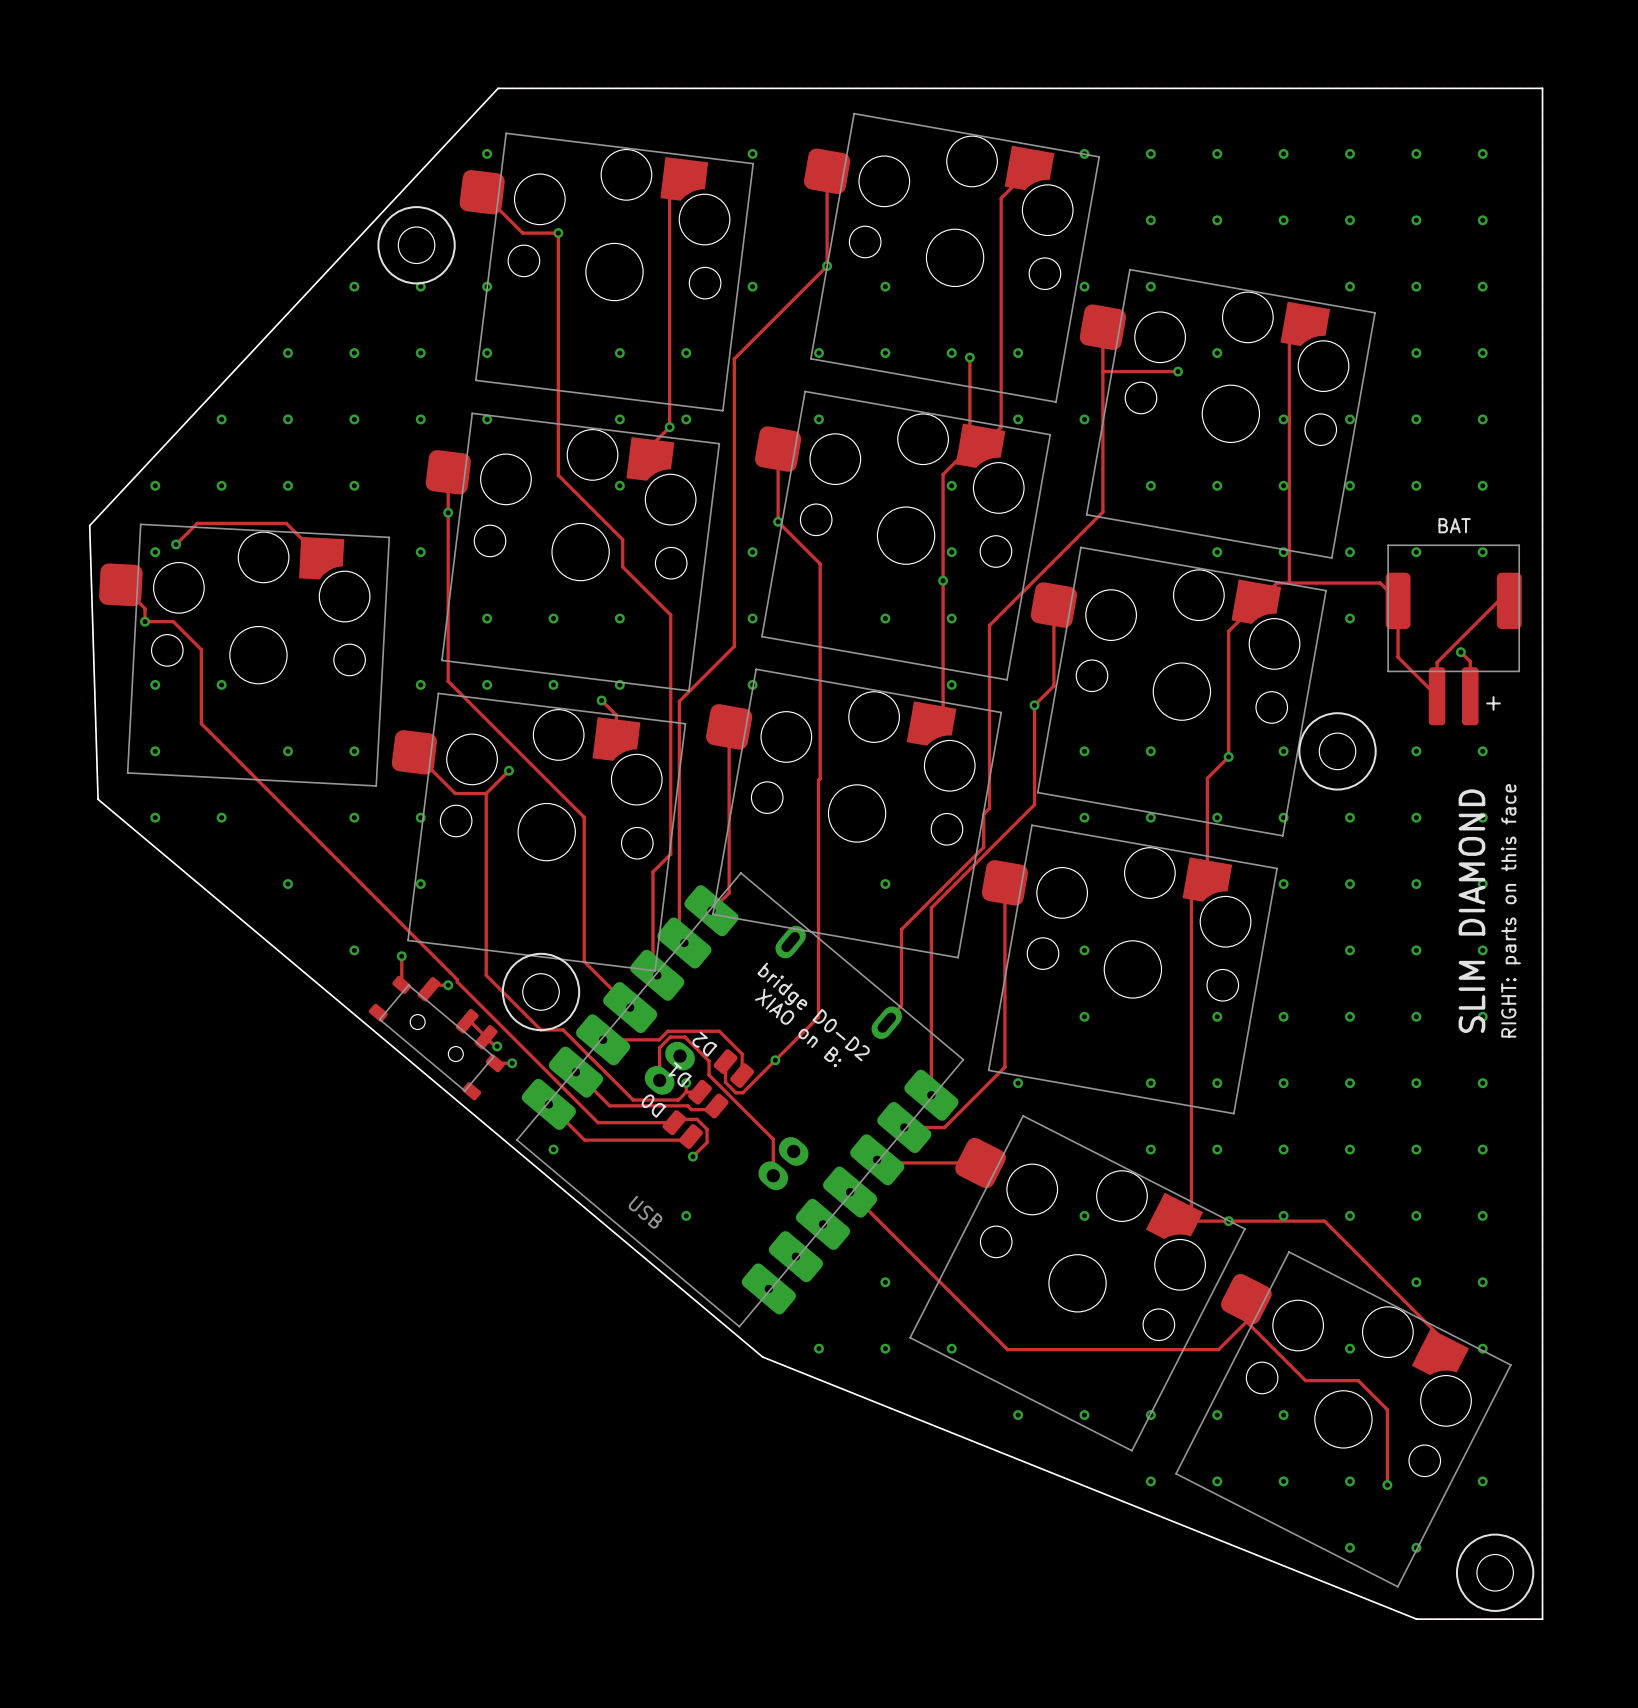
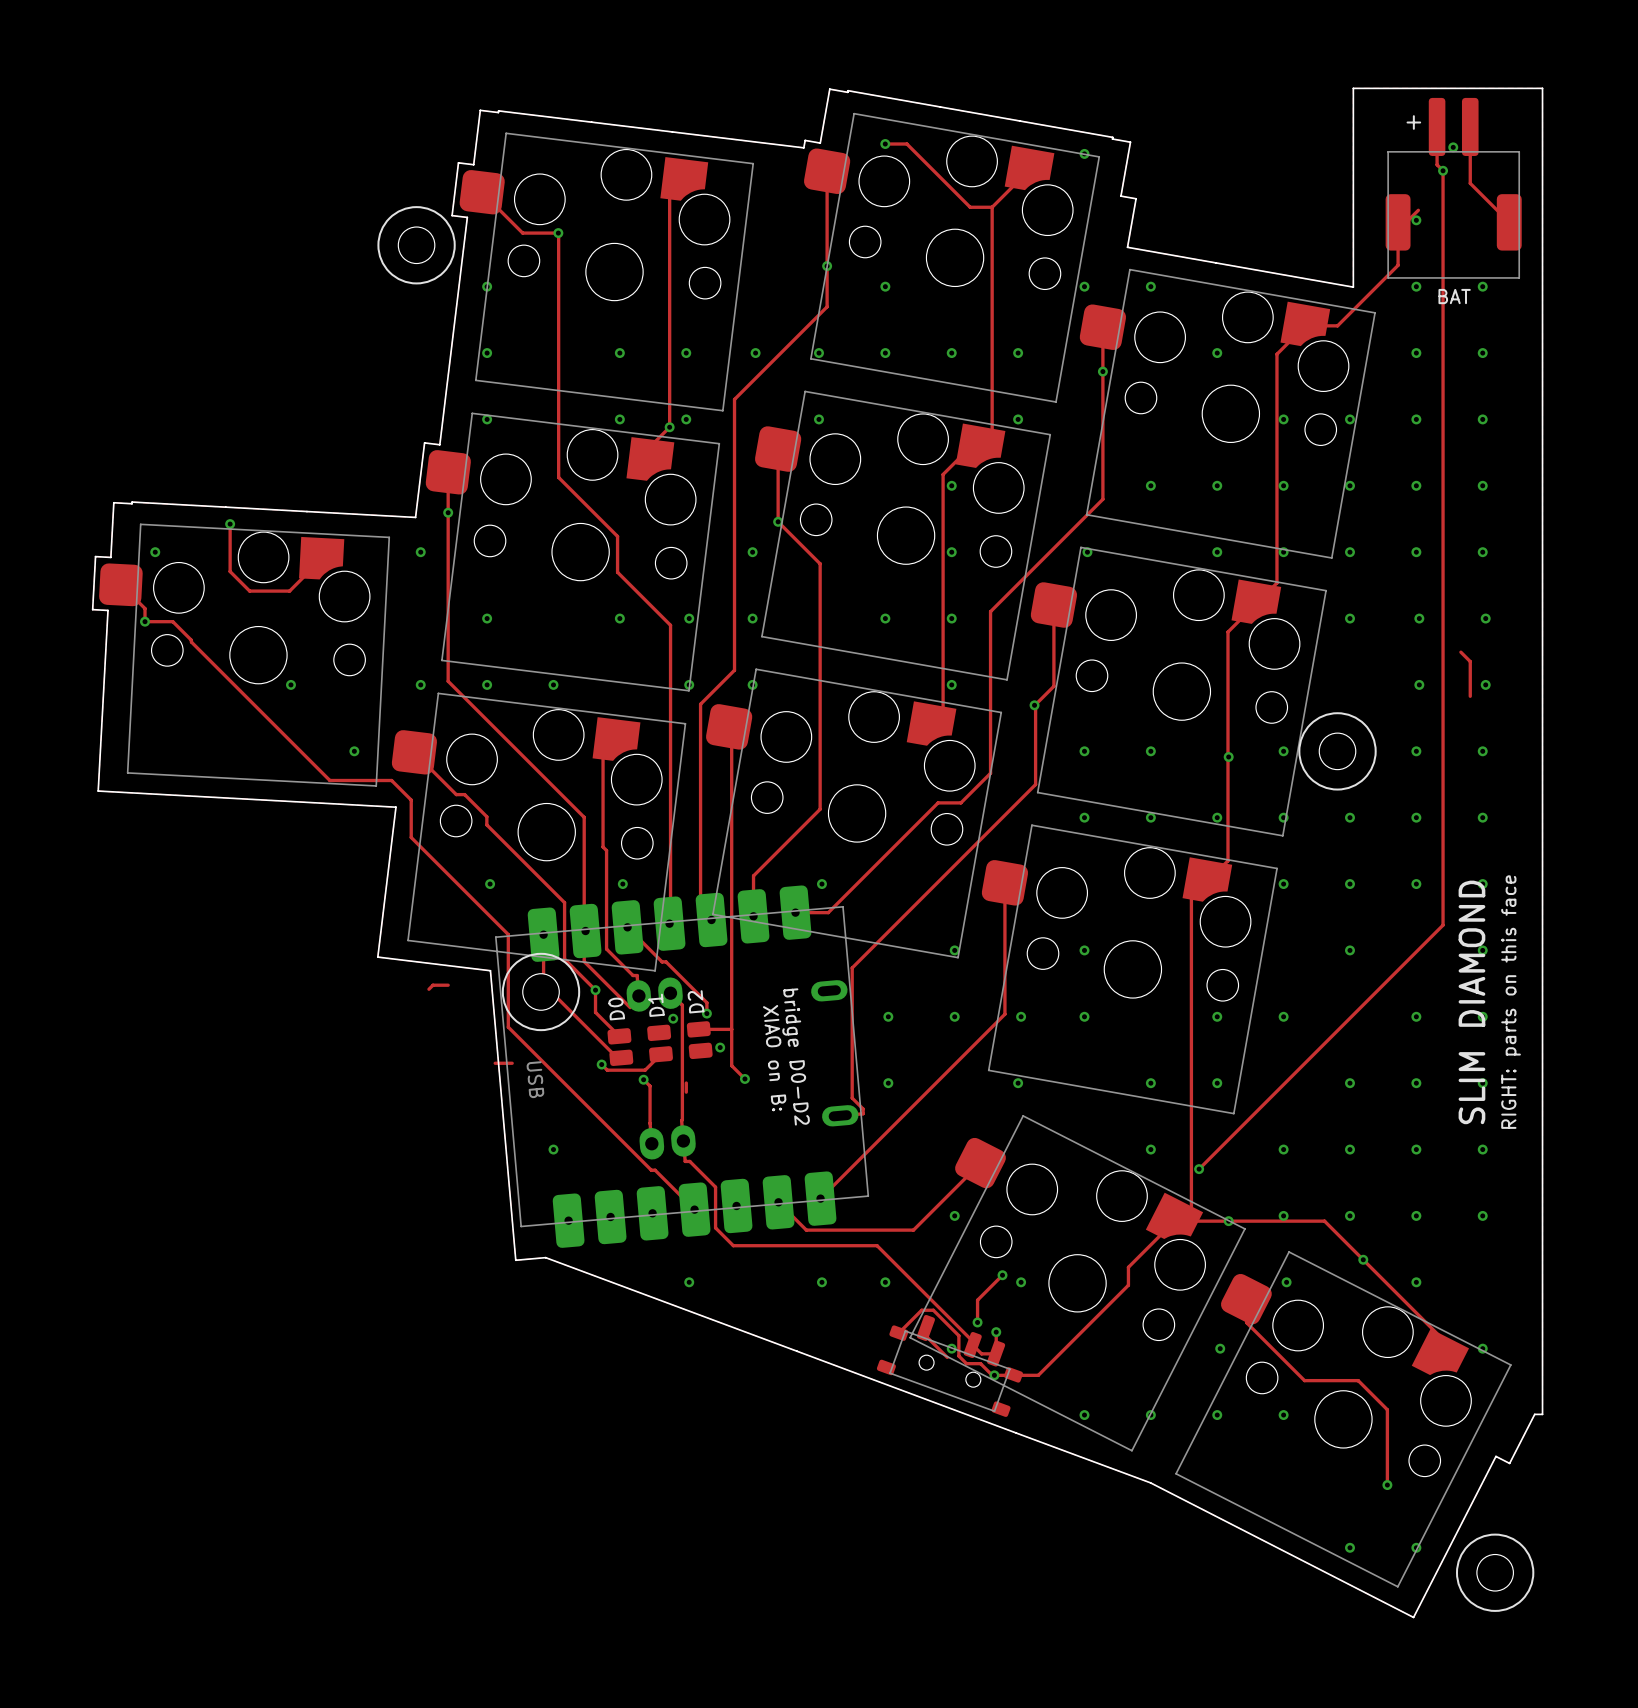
board edge: (1353, 88) (498, 88) (89, 525) (98, 799) (762, 1357) (1416, 1619) (1542, 1619) (1542, 1414) -> (1353, 88) (1353, 287) (1127, 247) (1136, 198) (1120, 196) (1130, 142) (1112, 139) (1112, 137) (848, 90) (847, 92) (829, 89) (820, 143) (805, 140) (803, 147) (498, 110) (498, 112) (480, 110) (473, 164) (458, 162) (452, 215) (467, 217) (439, 444) (424, 442) (415, 517) (132, 502) (132, 503) (113, 502) (110, 557) (95, 556) (92, 609) (108, 610) (98, 791) (395, 807) (377, 957) (490, 970) (515, 1260) (545, 1257) (1150, 1482) (1413, 1617) (1495, 1456) (1509, 1463) (1534, 1414) (1542, 1414)
track: none -> (1437, 126) (1437, 164) (1443, 170) (1443, 925) (1199, 1169)
track: none -> (1470, 126) (1470, 183) (1509, 222)
track: none -> (885, 144) (906, 144) (970, 207) (992, 207)
via: none -> (885, 144)
via: none -> (1453, 147)
via: (487, 153) -> none
via: (752, 153) -> none
via: (1150, 153) -> none
via: (1217, 153) -> none
via: (1283, 153) -> none
via: (1349, 153) -> none
via: (1416, 153) -> none
via: (1482, 153) -> none
via: none -> (1443, 170)
part: none -> (1453, 188)
track: (1001, 198) (1001, 427) (992, 436) -> (992, 207) (992, 436)
track: none -> (1001, 198) (992, 207)
track: none -> (1418, 210) (1406, 222) (1398, 222) (1398, 265) (1337, 325) (1305, 325)
via: (1150, 220) -> none
via: (1217, 220) -> none
via: (1283, 220) -> none
via: (1349, 220) -> none
via: (1482, 220) -> none
track: (558, 233) (558, 475) (622, 539) (622, 566) (670, 615) (670, 854) (652, 871) (652, 971) (657, 975) -> (558, 233) (558, 477) (617, 536) (617, 572) (670, 625) (669, 923)
track: (827, 266) (734, 358) (734, 646) (679, 701) (679, 937) (684, 943) -> (827, 266) (827, 306) (734, 399) (734, 670) (700, 704) (700, 909) (711, 919)
via: (354, 286) -> none
via: (420, 286) -> none
via position: (752, 286) -> (755, 353)
via: (1349, 286) -> none
track: (1289, 341) (1289, 583) -> (1289, 341) (1276, 354) (1276, 583)
via: (287, 353) -> none
via: (354, 353) -> none
via: (420, 353) -> none
track: (969, 357) (969, 447) (980, 447) -> none
via: (969, 357) -> none
track: (1102, 371) (1178, 371) -> none
via: none -> (1102, 371)
via: (1178, 371) -> none
via: (221, 419) -> none
via: (287, 419) -> none
via: (354, 419) -> none
via: (420, 419) -> none
via: (1084, 419) -> none
via: (155, 485) -> none
via: (221, 485) -> none
via: (287, 485) -> none
via: (354, 485) -> none
via: (619, 485) -> none
track: (1102, 499) (1102, 512) (989, 625) (989, 808) (983, 814) (983, 847) (901, 929) (901, 1005) (886, 1022) -> (1102, 499) (990, 611) (990, 773) (960, 802) (938, 802) (828, 912) (795, 912)
via: none -> (230, 524)
track: (176, 544) (197, 523) (286, 523) (321, 558) -> (230, 524) (230, 571) (249, 591) (289, 591) (321, 558)
via: (176, 544) -> none
via: none -> (1087, 552)
via: (943, 580) -> none
track: (1276, 583) (1380, 583) (1398, 600) (1398, 657) (1437, 696) (1437, 662) (1498, 600) (1509, 600) -> none
via: (553, 618) -> none
via: none -> (689, 618)
via: none -> (1419, 618)
via: none -> (1485, 618)
track: (172, 621) (201, 649) (201, 723) (598, 1122) (674, 1122) (677, 1119) (697, 1119) (707, 1129) (707, 1142) (692, 1156) -> (172, 621) (329, 780) (391, 780) (411, 800) (411, 837) (508, 934) (508, 1027) (651, 1170) (655, 1170) (694, 1209)
track: (1228, 631) (1228, 756) (1207, 778) (1207, 881) -> (1228, 631) (1227, 860) (1207, 881)
part: (1453, 634) -> none
via: (1460, 652) -> none
via: (155, 684) -> none
via: (221, 684) -> none
via: none -> (290, 684)
via: (619, 684) -> none
via: none -> (689, 684)
via: none -> (1419, 684)
via: none -> (1485, 684)
track: (1053, 685) (1034, 705) (1034, 804) (931, 907) (931, 1095) -> (1053, 685) (1035, 704) (1035, 784) (852, 967) (852, 1098) (863, 1109) (863, 1113) (840, 1115)
track: (601, 700) (616, 715) (616, 740) -> (638, 995) (637, 975) (633, 975) (606, 949) (606, 850) (603, 847) (603, 753) (616, 740)
via: (601, 700) -> none
track: (729, 726) (729, 893) (711, 910) -> (729, 726) (731, 729) (731, 1065) (744, 1078)
via: (155, 751) -> none
via: (287, 751) -> none
track: (508, 770) (486, 793) -> none
via: (508, 770) -> none
track: (820, 778) (818, 780) (818, 1017) (742, 1092) (735, 1092) (725, 1082) (725, 1061) -> (820, 778) (820, 809) (753, 875) (753, 916)
track: (455, 793) (486, 793) -> (455, 793) (464, 794) (486, 816) (486, 824) (564, 902) (564, 959) (595, 990) (595, 1012) (619, 1036)
track: (486, 793) (486, 975) (540, 1029) (563, 1029) (633, 1100) (678, 1100) (686, 1092) (700, 1092) -> none
via: (155, 817) -> none
via: (221, 817) -> none
via: (354, 817) -> none
via: (420, 817) -> none
via: (287, 884) -> none
via: (420, 884) -> none
via: none -> (490, 884)
via: none -> (622, 884)
via: none -> (821, 884)
via: (885, 884) -> none
text position: RIGHT: parts on this face (1511, 910) -> RIGHT: parts on this face (1511, 1002)
text position: SLIM DIAMOND (1471, 911) -> SLIM DIAMOND (1471, 1002)
track: none -> (627, 927) (706, 1002) (706, 1013)
track: none -> (543, 934) (543, 984) (617, 1057) (621, 1057)
via: (354, 950) -> none
via: none -> (954, 950)
via: (1416, 950) -> none
track: (401, 956) (401, 984) -> none
via: (401, 956) -> none
via: (448, 985) -> none
via: none -> (595, 990)
track: none -> (670, 993) (682, 1005) (681, 1120) (685, 1161) (689, 1161) (715, 1187) (715, 1227) (733, 1245) (877, 1245) (972, 1341) (972, 1345) (981, 1353) (996, 1353) (996, 1332)
via: none -> (706, 1013)
track: (1004, 1014) (1004, 1067) (944, 1127) (904, 1127) -> (1004, 1014) (820, 1198)
via: none -> (888, 1016)
via: none -> (954, 1016)
via: none -> (1021, 1016)
via: (1349, 1016) -> none
via: none -> (673, 1018)
track: (467, 1021) (470, 1021) (497, 1046) -> none
track: none -> (698, 1029) (731, 1029)
part: (436, 1038) -> none
track: (603, 1039) (659, 1039) (667, 1031) (719, 1031) (742, 1054) (742, 1075) -> none
part: none -> (699, 1040)
part: none -> (660, 1043)
text rotation: 0° (704, 1044) -> 45° clockwise (695, 1001)
via: (497, 1046) -> none
part: none -> (620, 1047)
via: none -> (720, 1047)
track: none -> (661, 1054) (645, 1070) (607, 1070) (601, 1064)
via: (775, 1060) -> none
via: (512, 1063) -> none
via: none -> (601, 1064)
part: none -> (682, 1066)
part: (733, 1068) -> none
track: (576, 1072) (609, 1105) (687, 1105) (691, 1109) (712, 1109) (716, 1106) -> none
text rotation: 0° (679, 1074) -> 45° clockwise (656, 1005)
text position: D1 (679, 1074) -> D1 (656, 1005)
via: none -> (744, 1078)
track: none -> (643, 1079) (650, 1086) (651, 1143)
via: none -> (643, 1079)
track: (659, 1080) (659, 1047) (670, 1037) (684, 1037) (709, 1061) (709, 1075) (773, 1139) (773, 1175) -> none
via: (686, 1083) -> none
via: none -> (888, 1083)
via: (1283, 1083) -> none
part: (708, 1099) -> none
part: (740, 1099) -> none
track: (548, 1104) (584, 1140) (687, 1140) (690, 1136) -> none
text rotation: 0° (653, 1106) -> 45° clockwise (616, 1008)
text position: D0 (653, 1106) -> D0 (616, 1008)
part: (682, 1129) -> none
via position: (1217, 1149) -> (1199, 1169)
via: (692, 1156) -> none
track: (877, 1159) (880, 1162) (980, 1162) -> (778, 1202) (806, 1230) (913, 1230) (980, 1162)
track: (850, 1192) (1007, 1349) (1218, 1349) (1246, 1321) (1305, 1380) -> (1246, 1321) (1305, 1380)
via: (686, 1215) -> none
via: none -> (954, 1215)
via: (1084, 1215) -> none
track: none -> (1174, 1221) (1128, 1267) (1128, 1285) (1038, 1375) (992, 1375) (980, 1363) (966, 1363) (958, 1356) (958, 1335) (933, 1310) (921, 1310) (899, 1332)
via: none -> (1363, 1259)
track: none -> (1002, 1275) (977, 1300) (977, 1322)
via: none -> (1002, 1275)
via: none -> (689, 1282)
via: none -> (821, 1282)
via: none -> (1021, 1282)
via: none -> (1286, 1282)
via: (1482, 1282) -> none
via: none -> (977, 1322)
track: none -> (926, 1327) (926, 1336) (947, 1357)
via: none -> (996, 1332)
via: (818, 1348) -> none
via: (885, 1348) -> none
via: none -> (1220, 1348)
via: (1349, 1348) -> none
part: none -> (949, 1365)
via: none -> (994, 1375)
via: (1018, 1415) -> none
via: (1150, 1481) -> none
via: (1217, 1481) -> none
via: (1283, 1481) -> none
via: (1349, 1481) -> none
via: (1482, 1481) -> none

